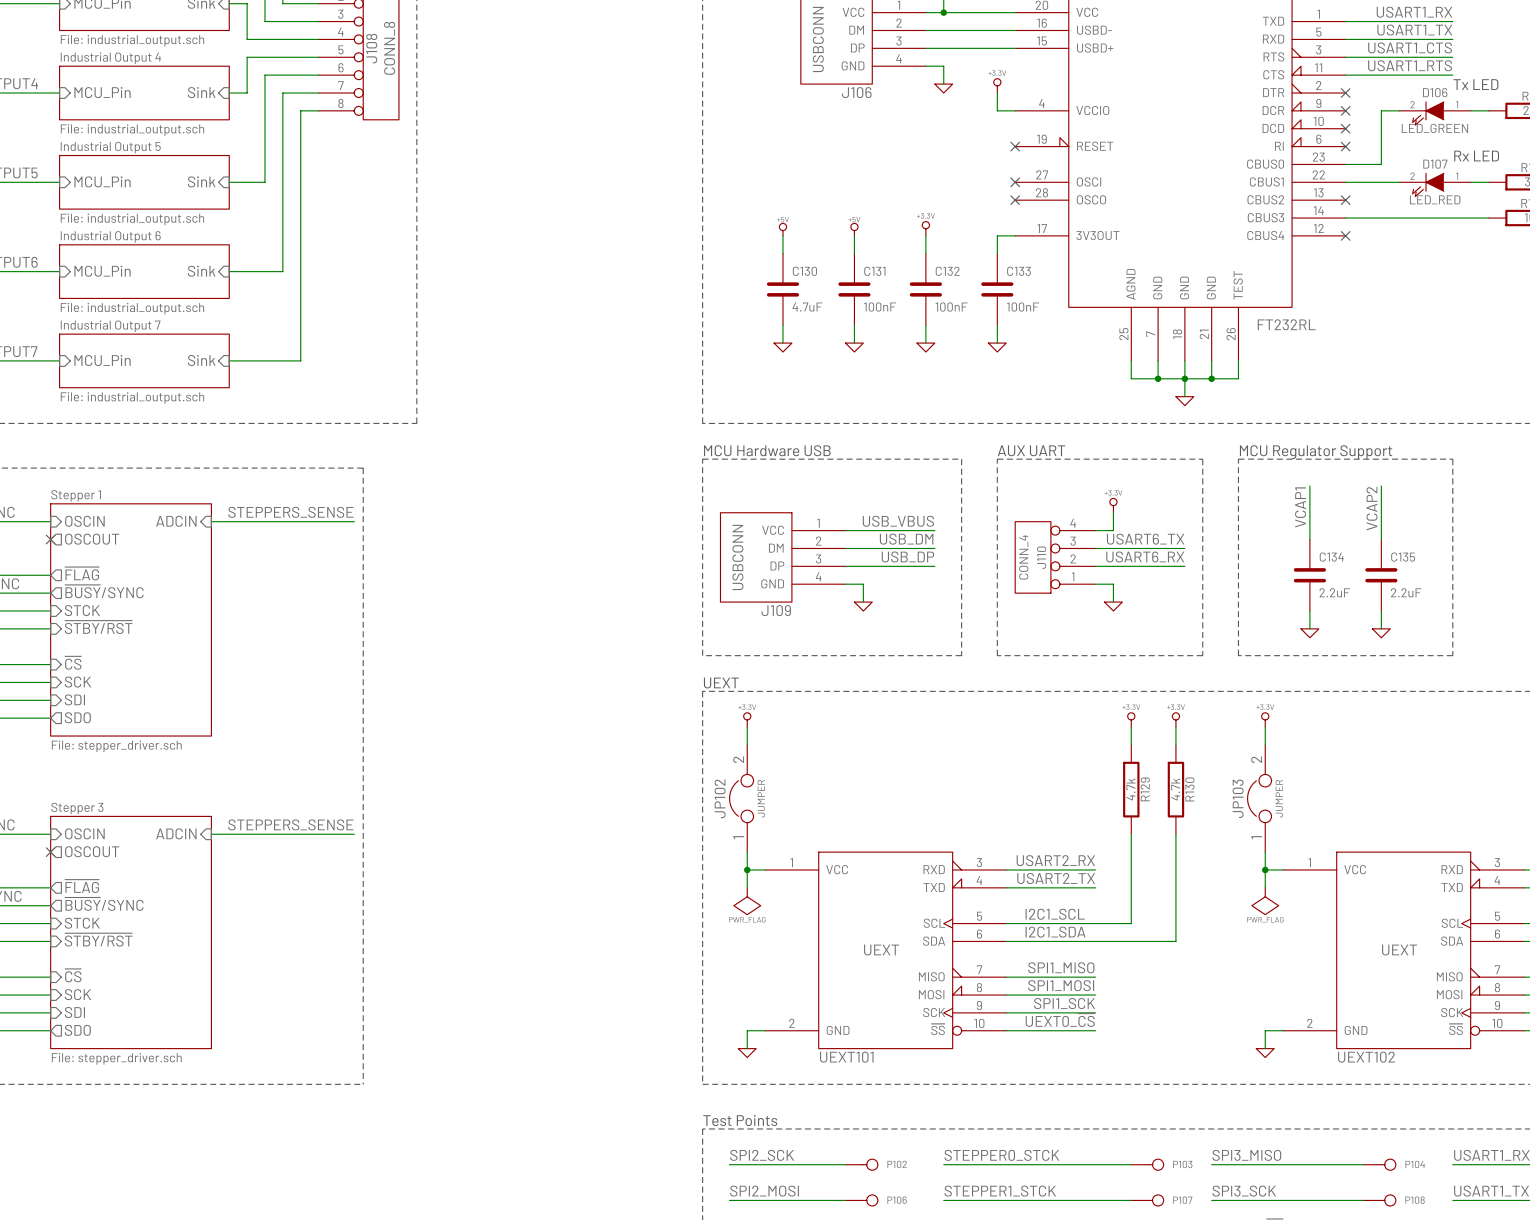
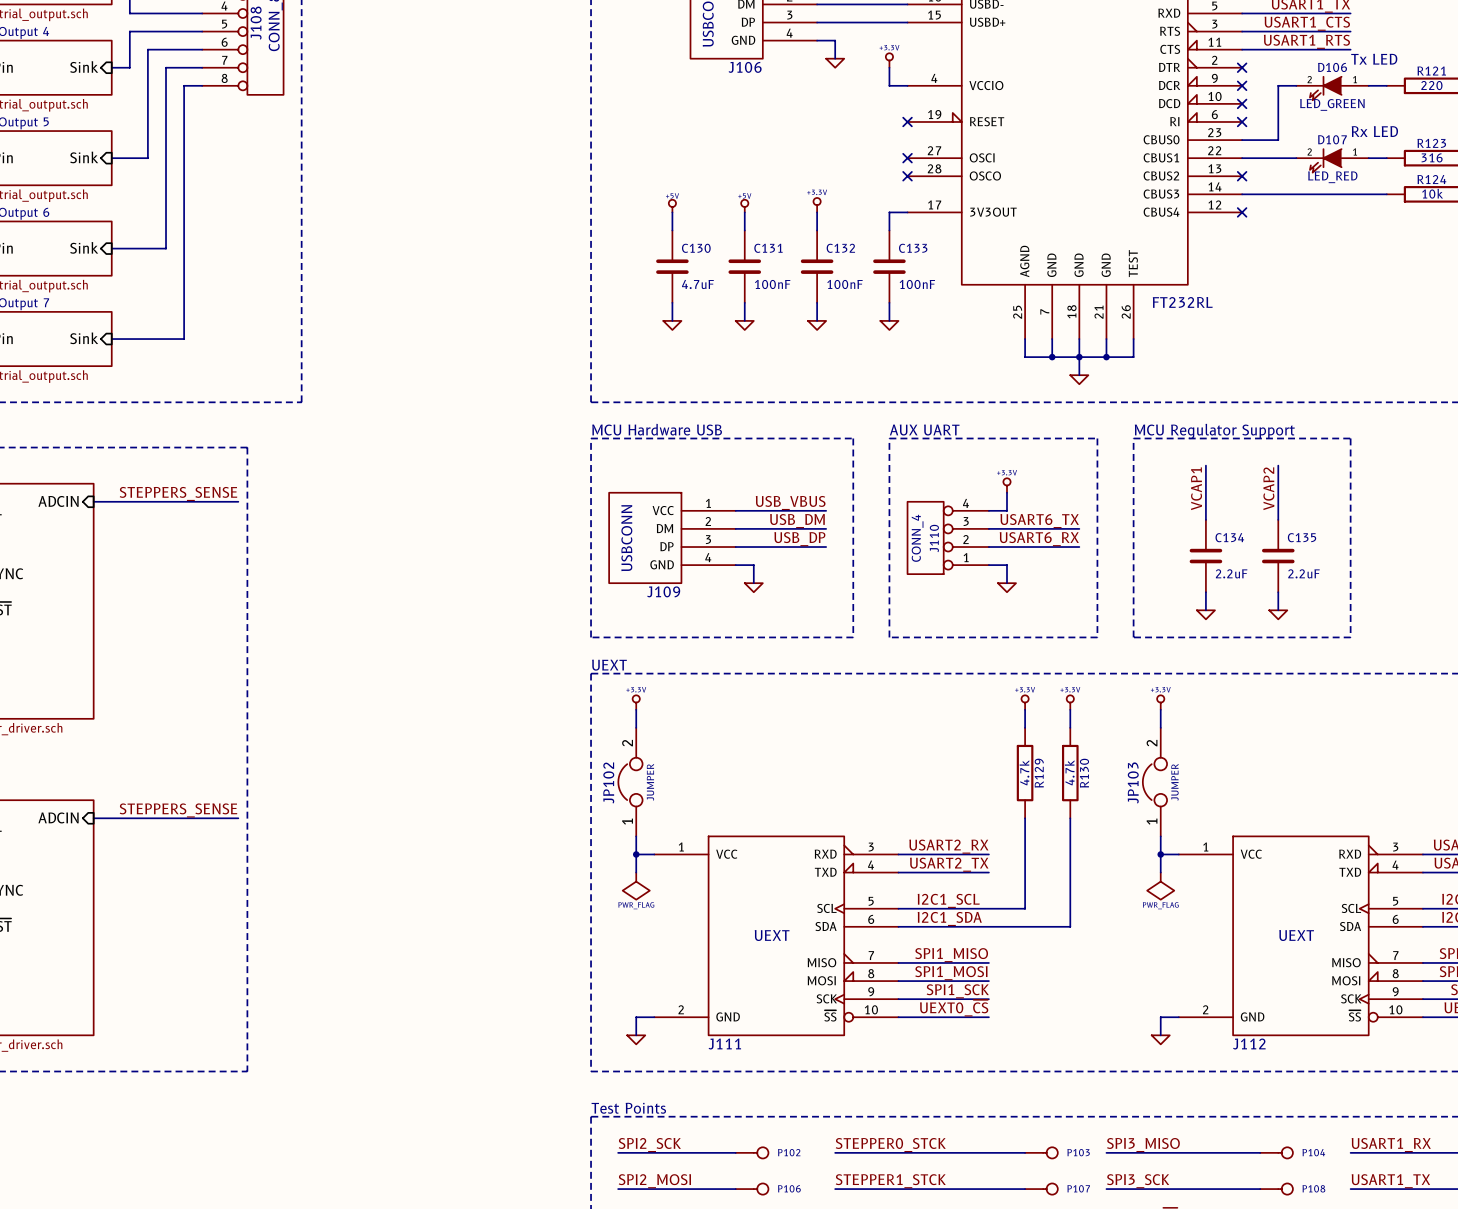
UEXT101 name: UEXT101 (846, 1057) -> J111 (724, 1044)
UEXT102 name: UEXT102 (1366, 1057) -> J112 (1249, 1044)

